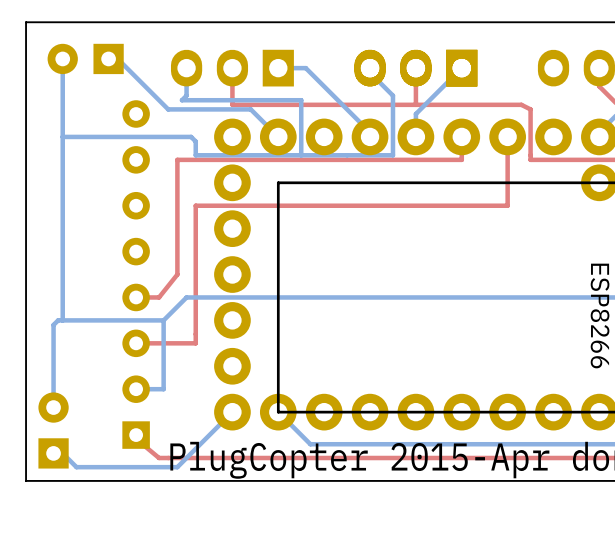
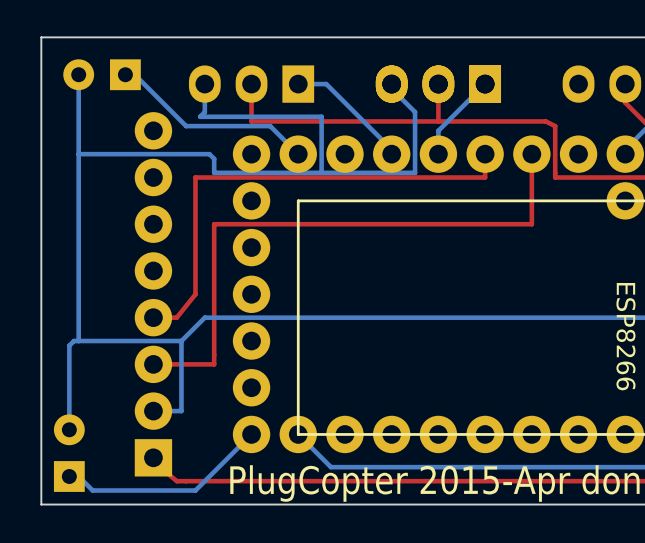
part footprint: [122, 100, 150, 449] -> [134, 112, 173, 477]

